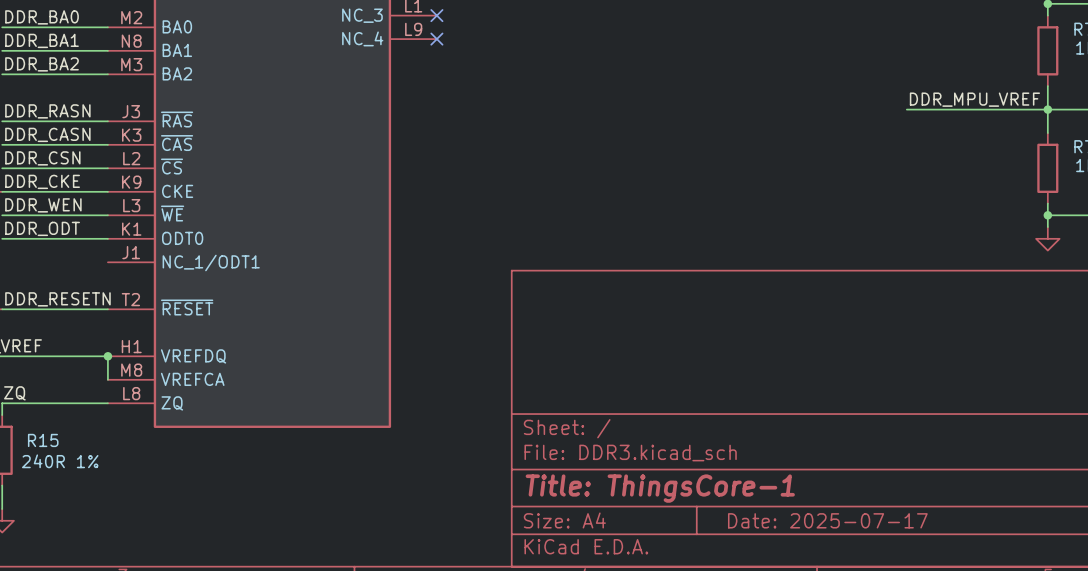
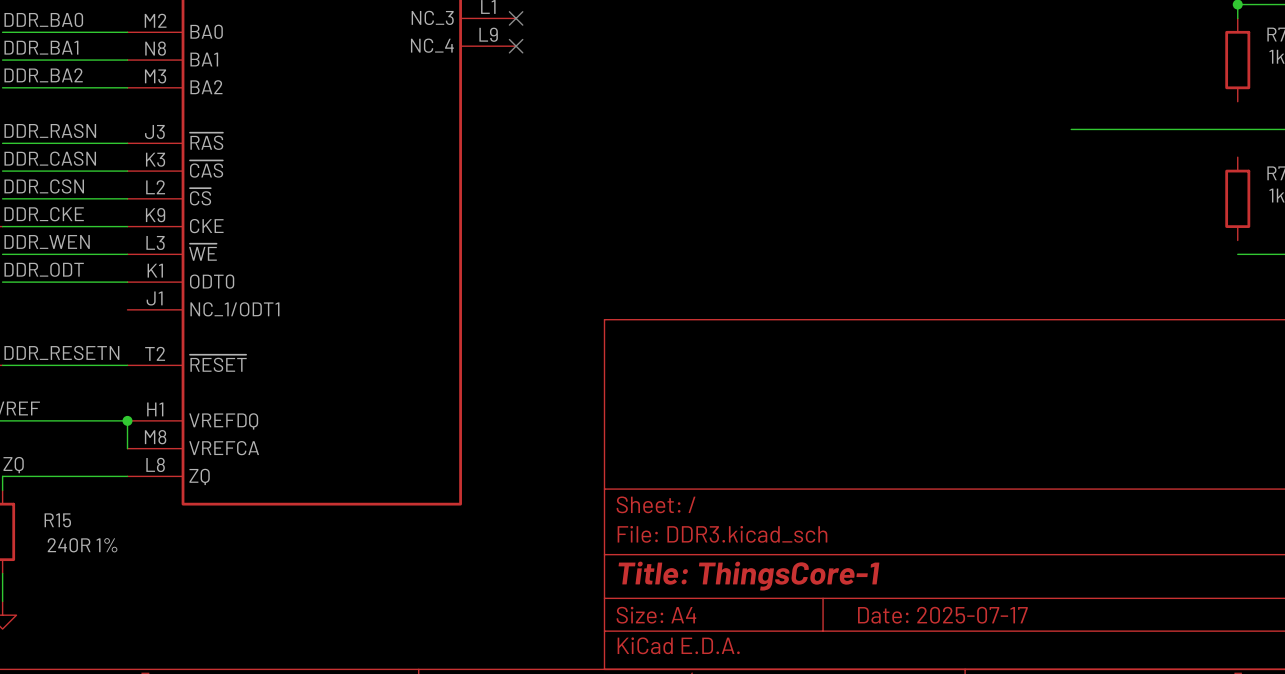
wire: (1047, 86) (1047, 133) -> none
label: DDR_MPU_VREF (974, 99) -> none
junction: (1047, 109) -> none
wire: (1047, 203) (1047, 227) -> none
junction: (1047, 215) -> none
power symbol: (1047, 238) -> none

